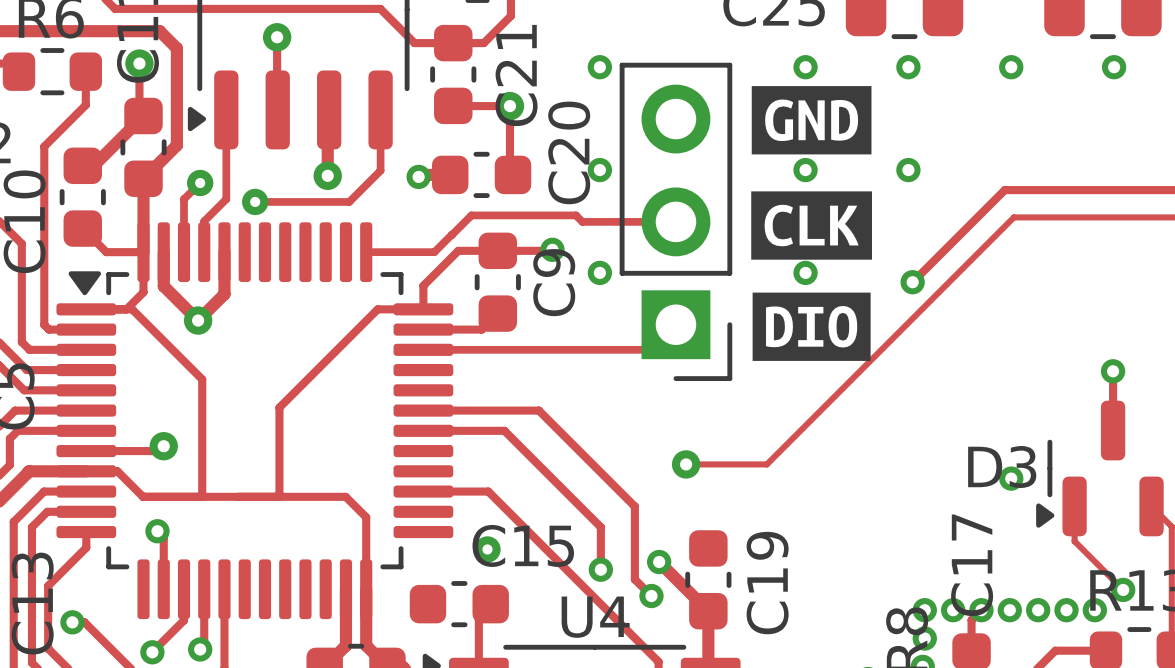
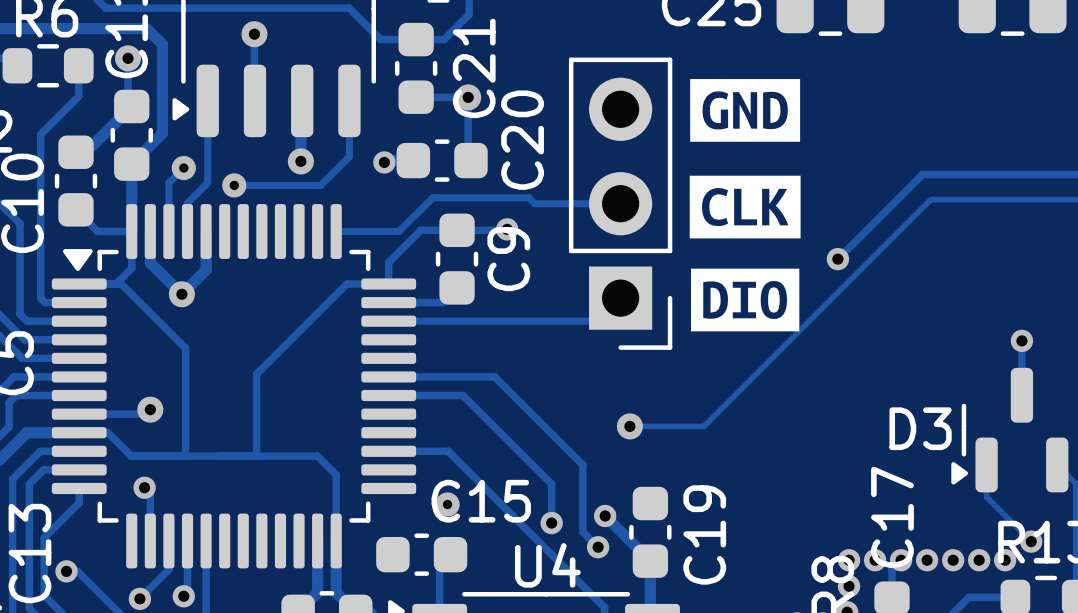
via: (599, 67) -> none
via: (805, 67) -> none
via: (908, 67) -> none
via: (1011, 67) -> none
via: (1114, 67) -> none
via: (599, 170) -> none
via: (805, 170) -> none
via: (908, 170) -> none
via: (599, 272) -> none
via: (805, 272) -> none
via: (1011, 478) -> none

